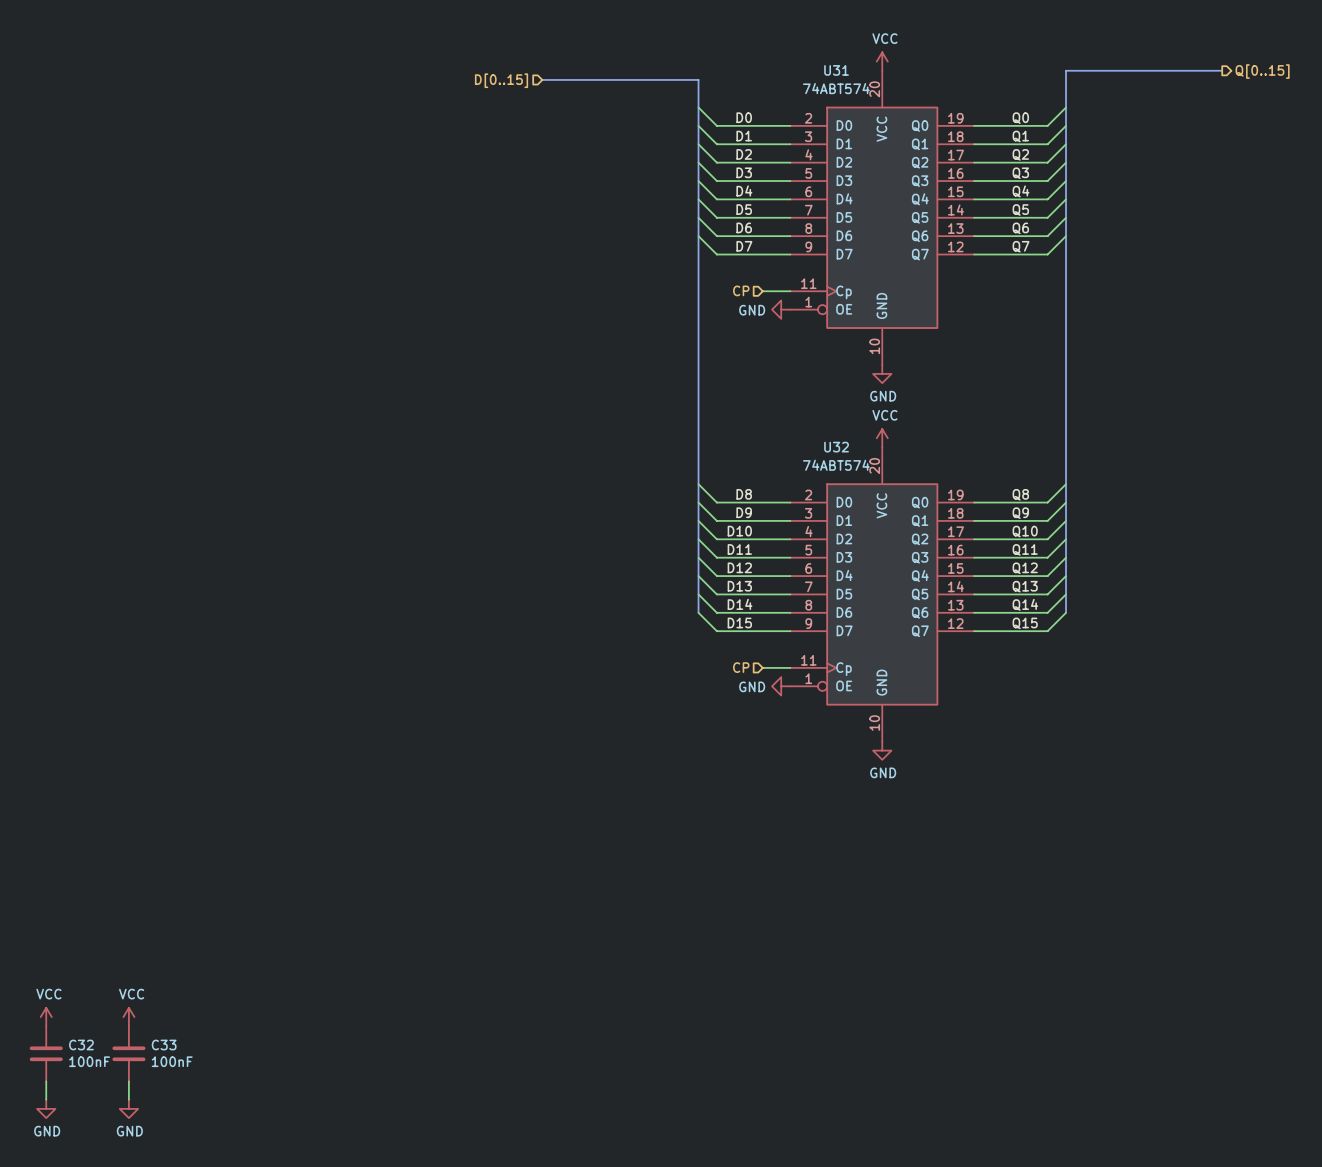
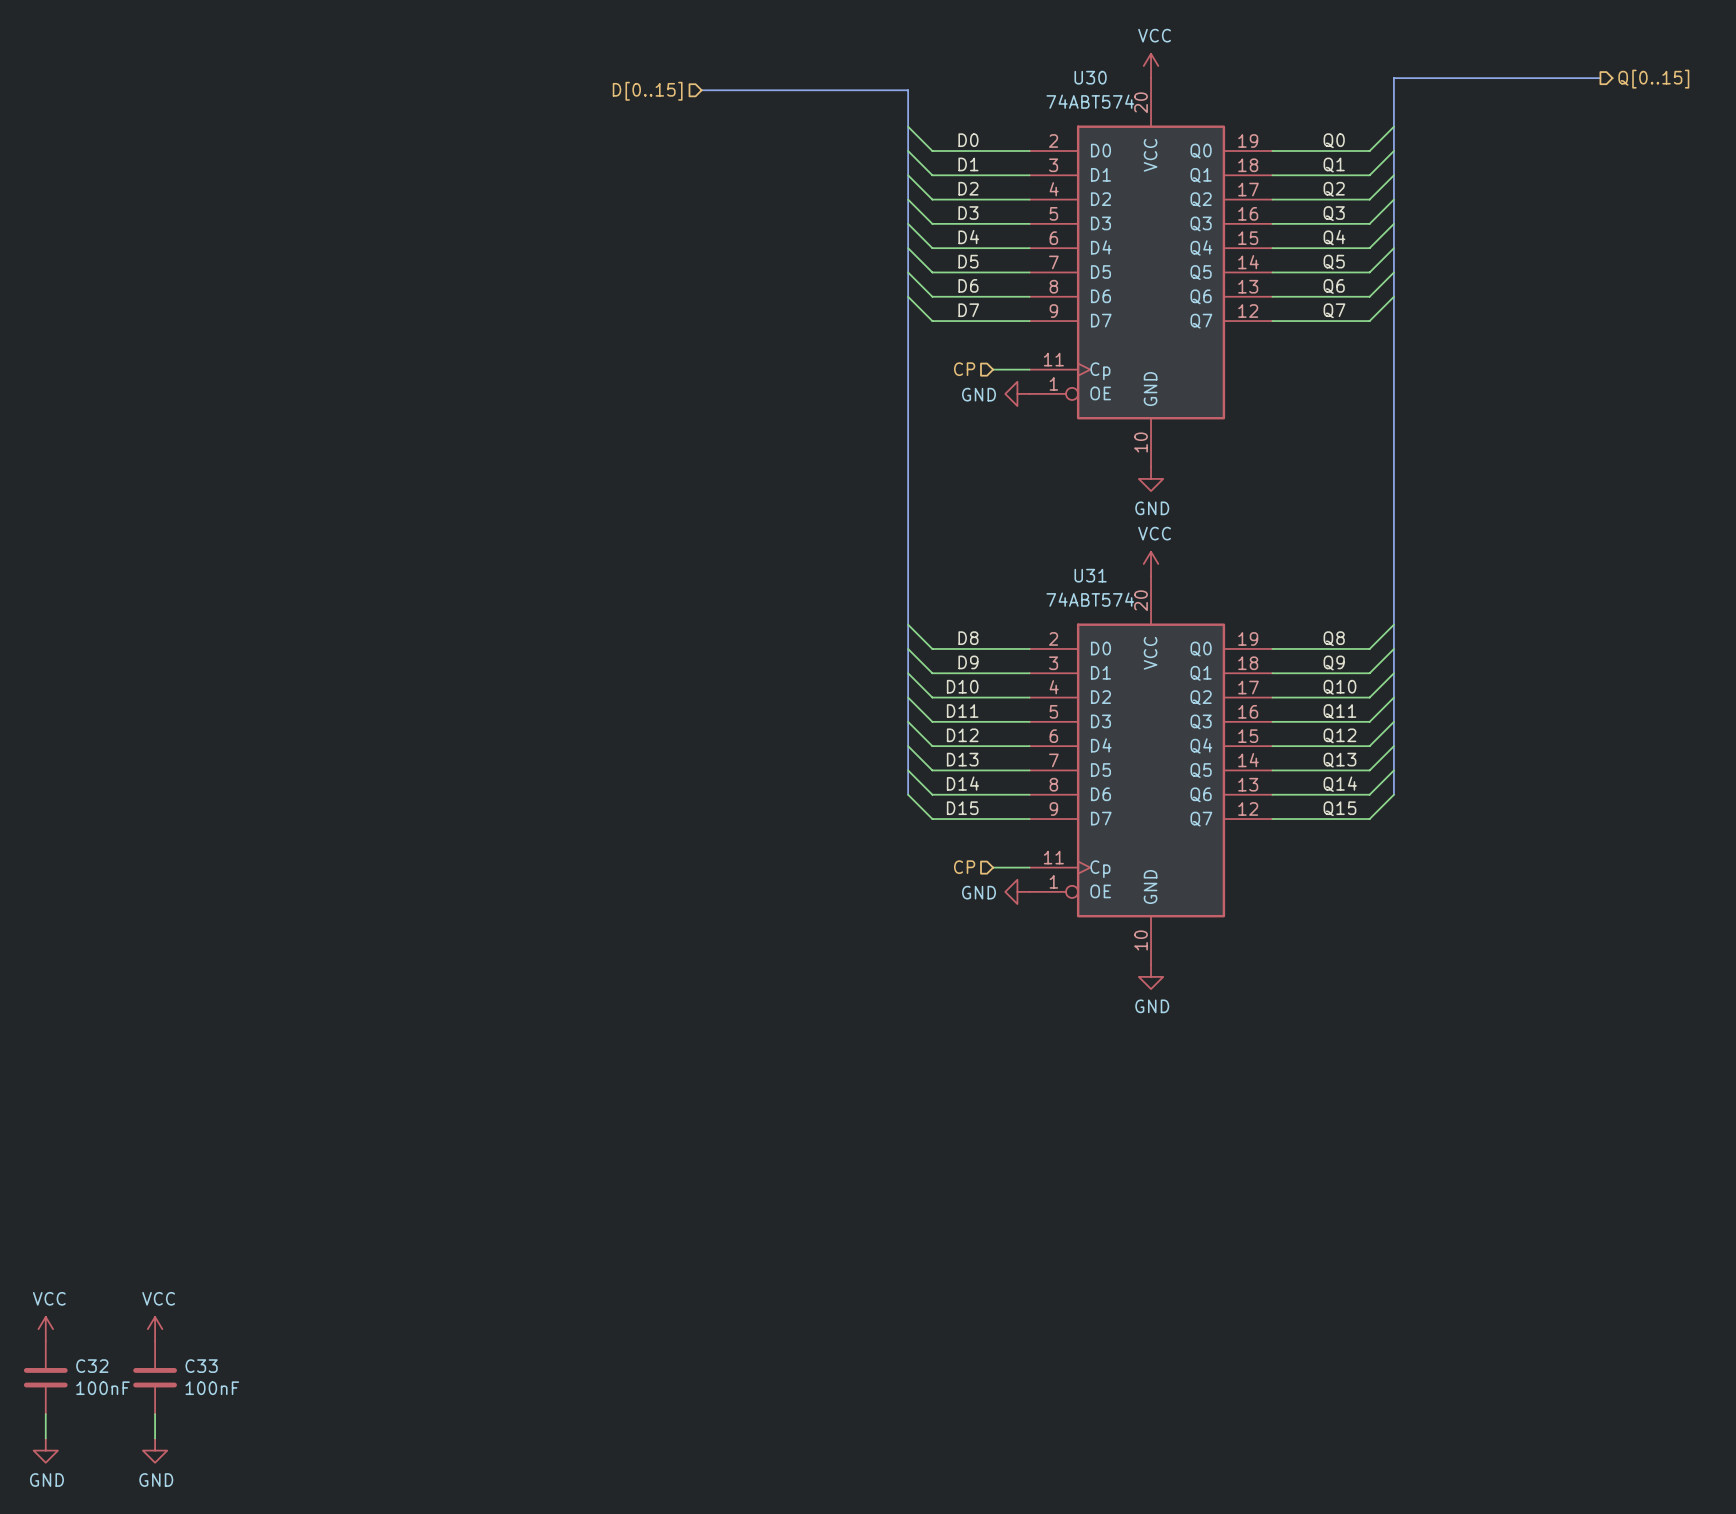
U31 name: U31 (836, 70) -> U30 (1090, 77)
U32 name: U32 (836, 447) -> U31 (1090, 575)

